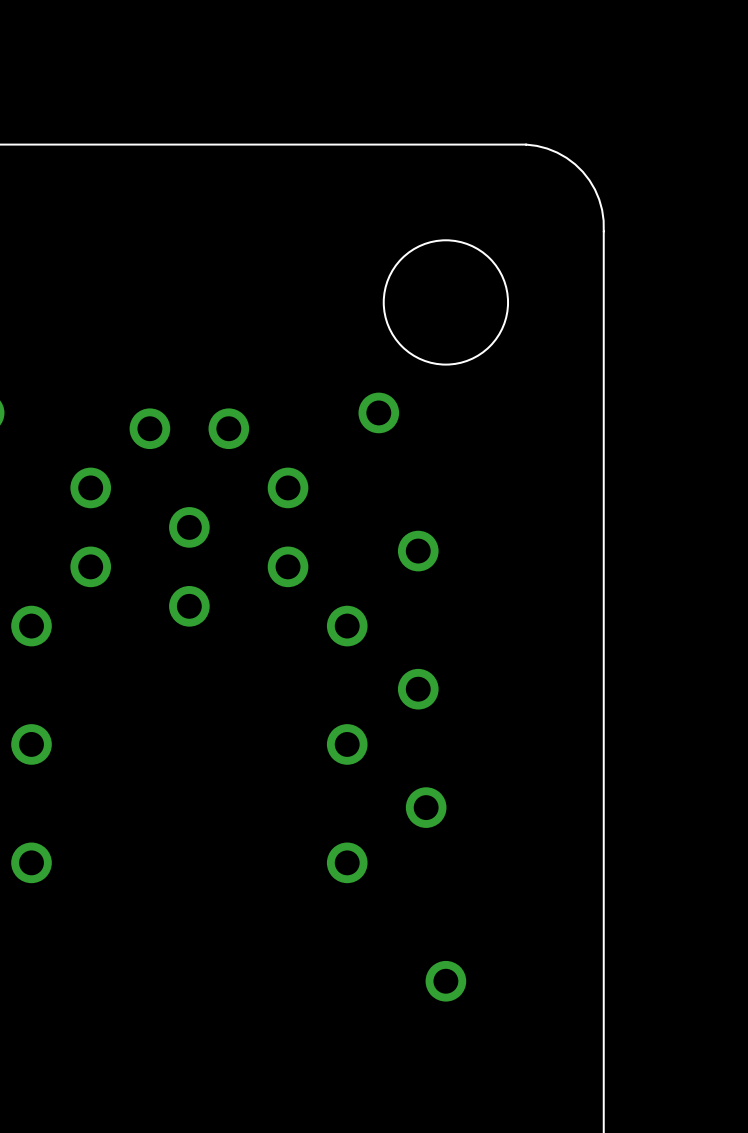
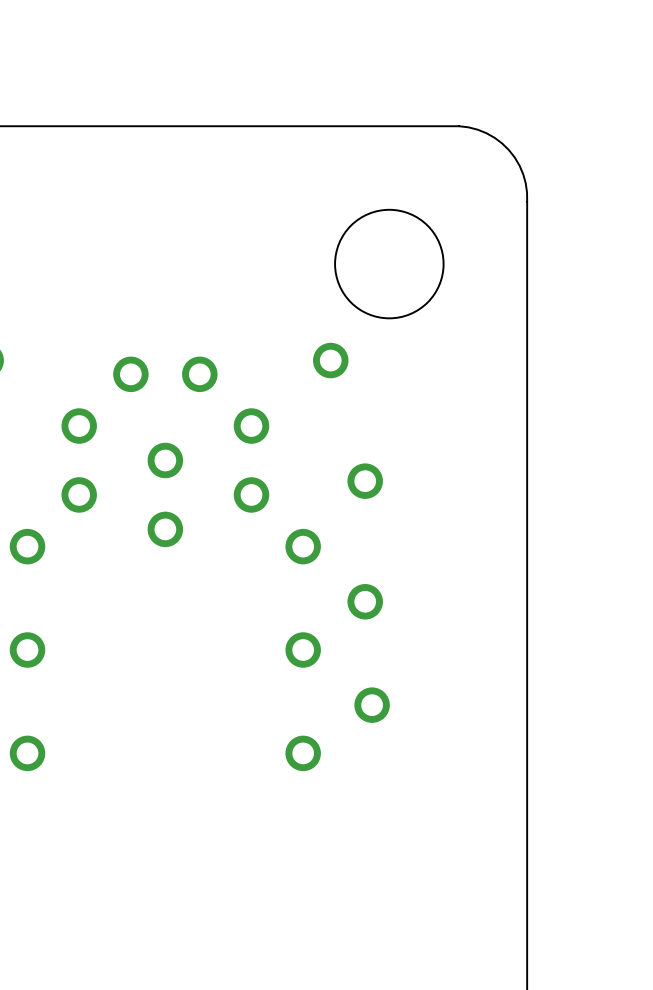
via: (445, 981) -> none

